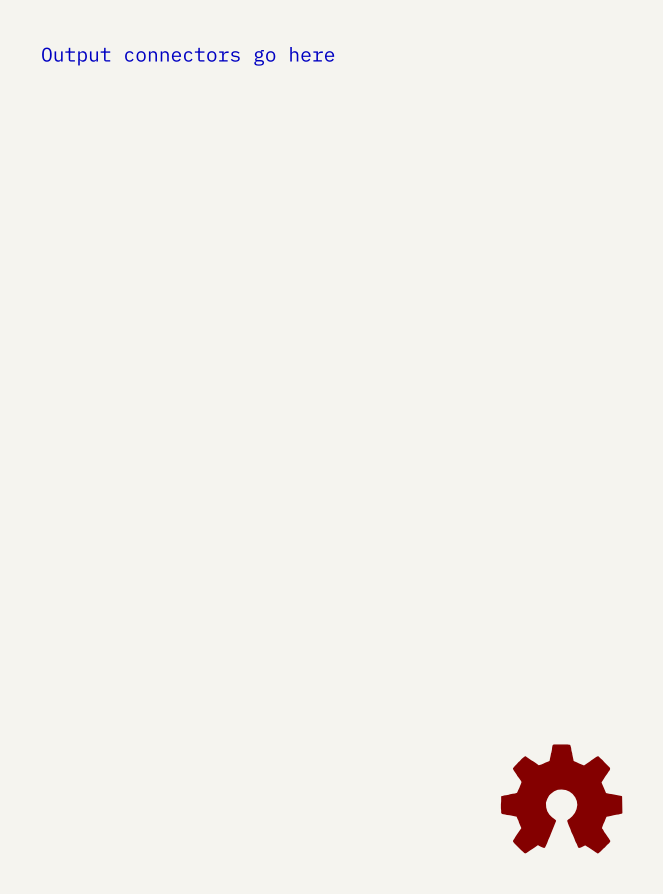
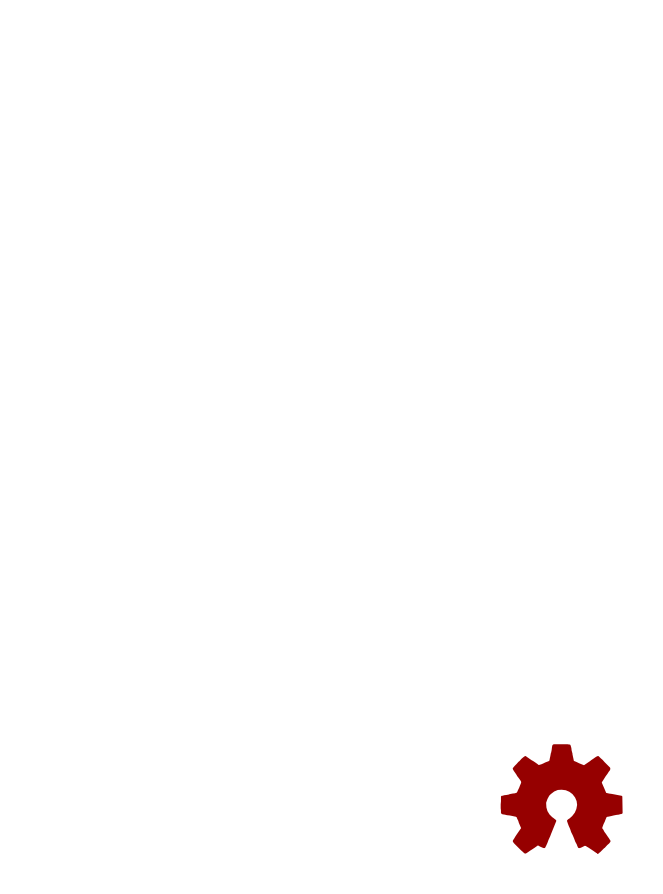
text: Output connectors go here (188, 56) -> none

